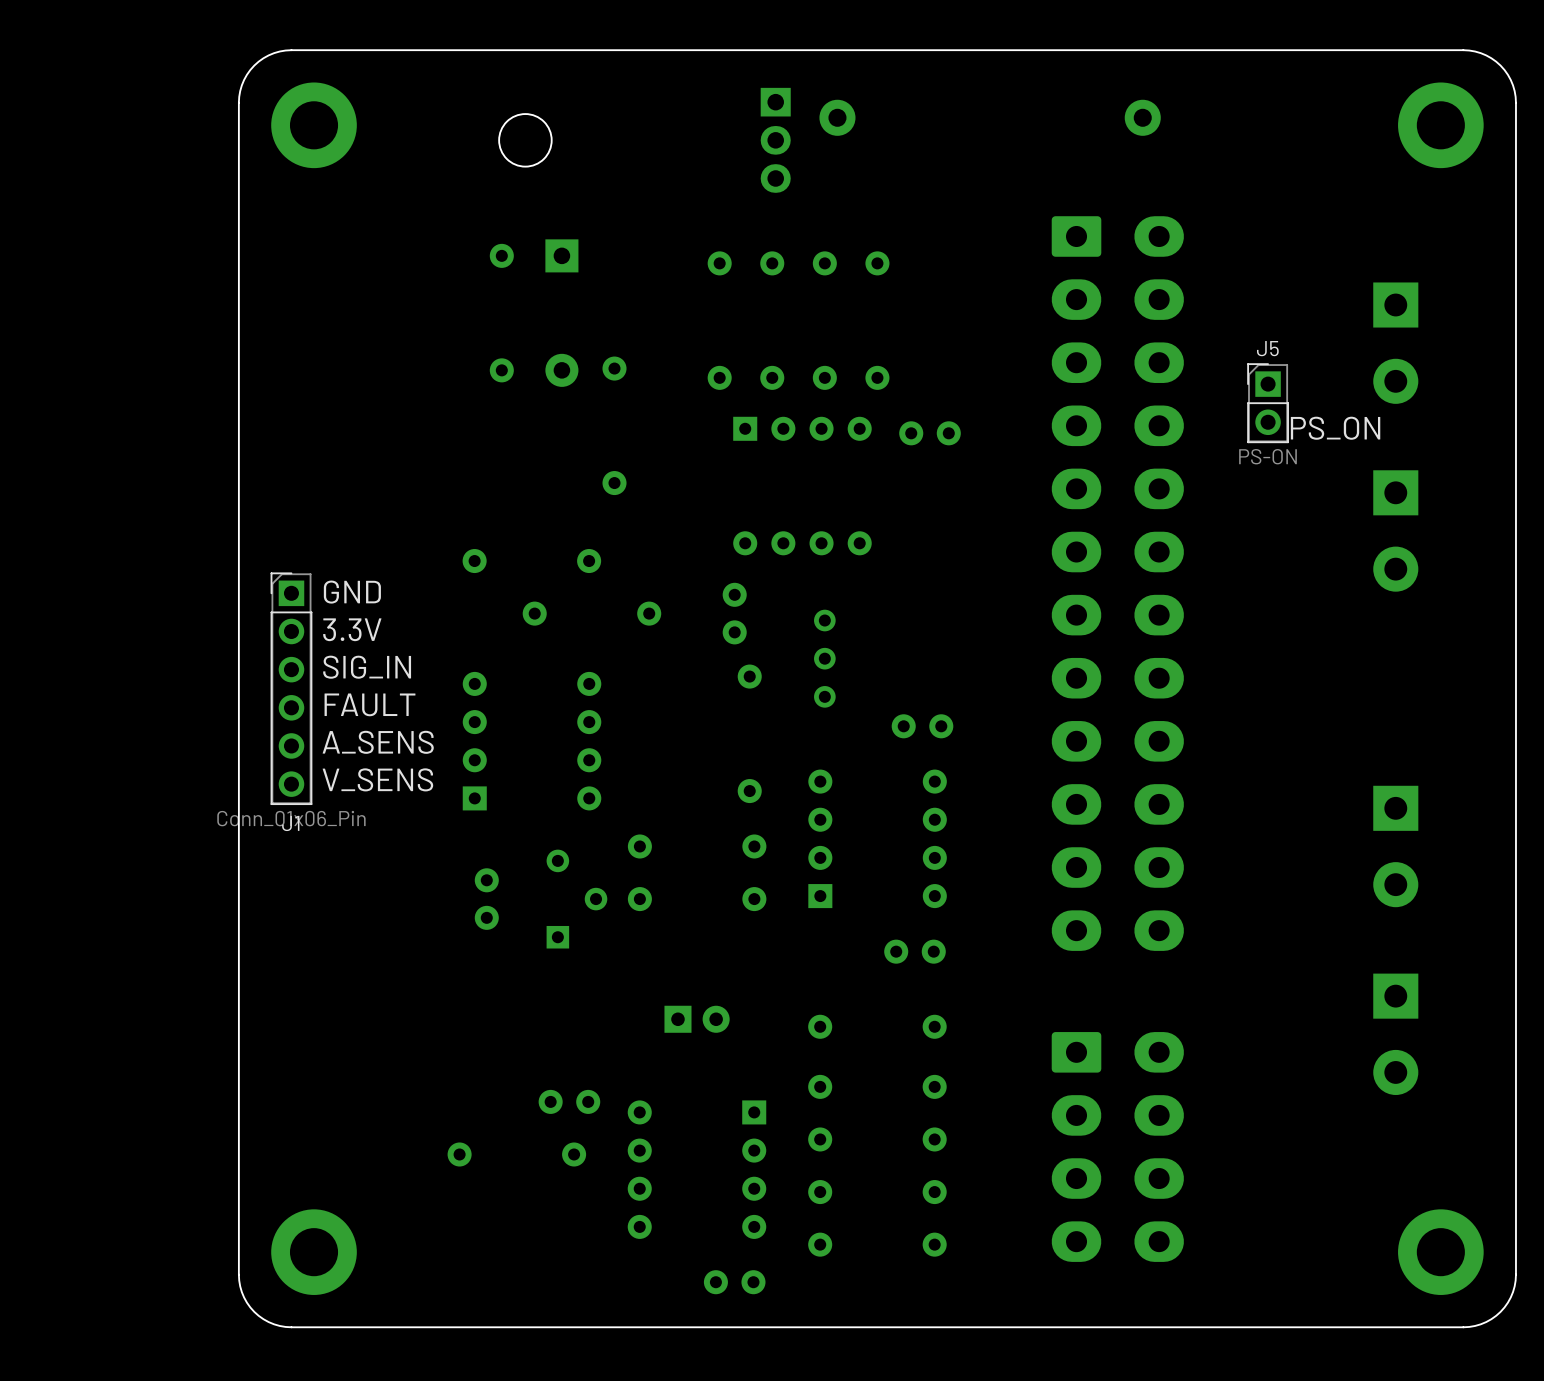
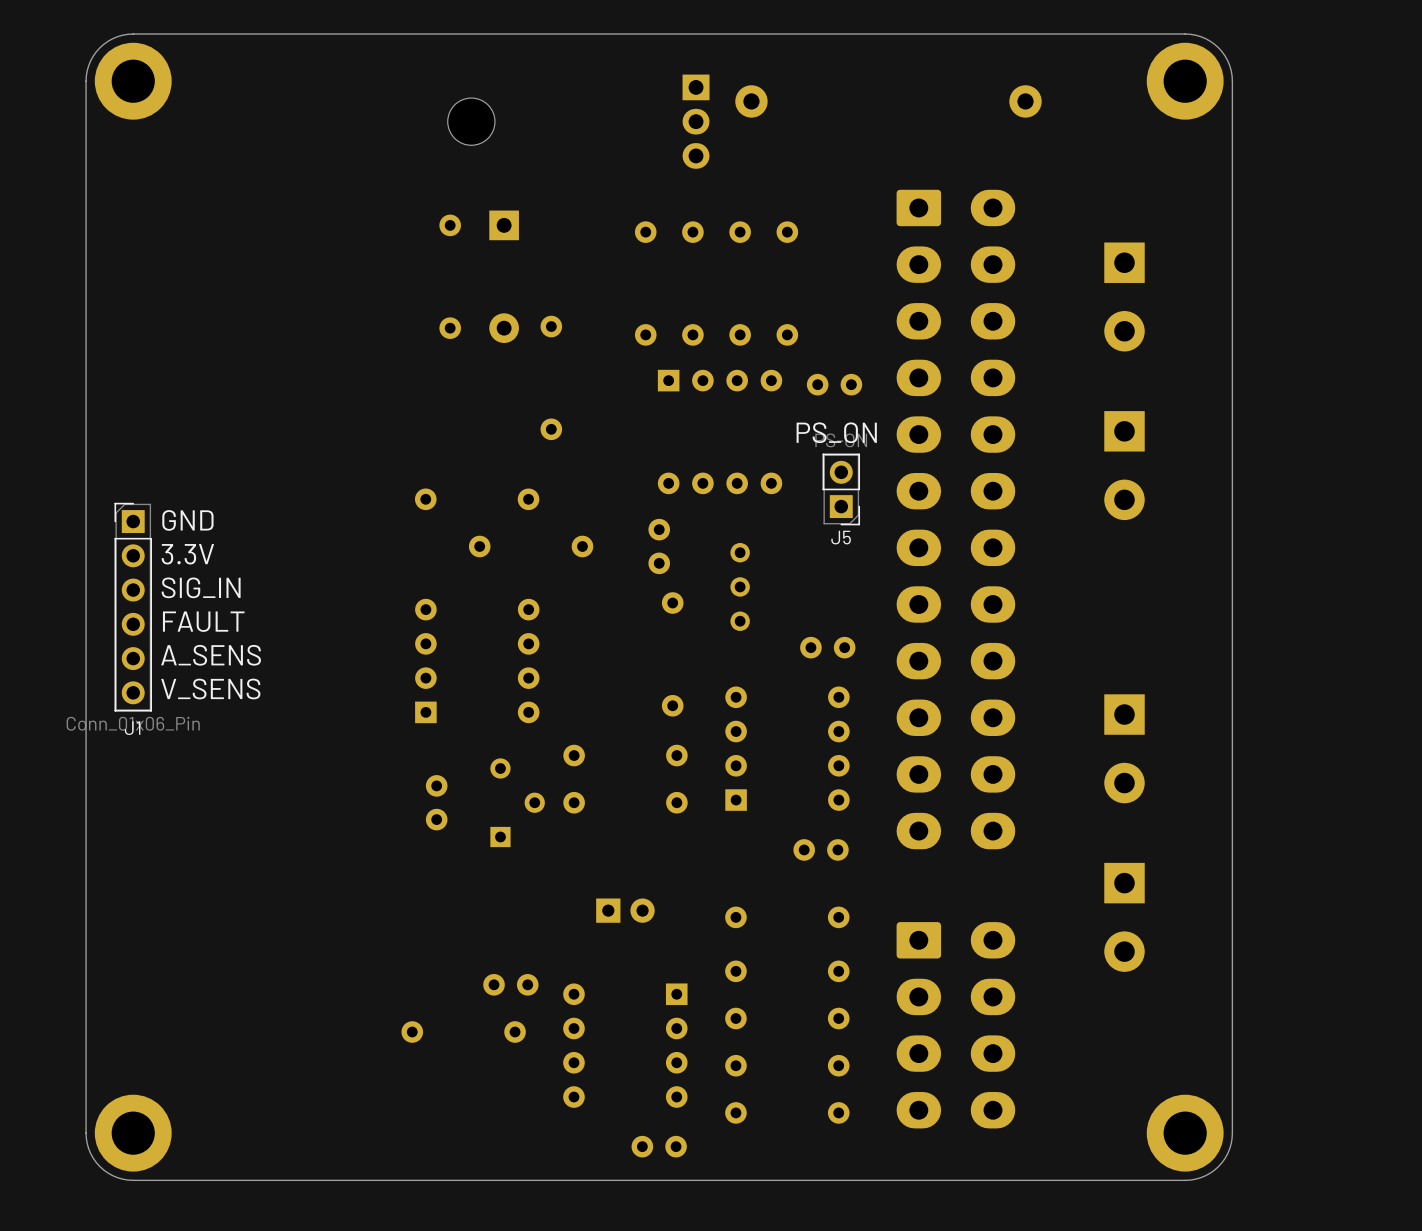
board edge: (1463, 50) (291, 50) (274, 53) (254, 65) (241, 85) (238, 102) (238, 1274) (241, 1292) (254, 1311) (274, 1324) (291, 1327) (1463, 1327) (1480, 1324) (1500, 1311) (1513, 1292) (1515, 1274) (1515, 102) (1513, 85) (1500, 65) (1480, 53) (1463, 50) -> (1185, 34) (133, 34) (112, 38) (99, 47) (88, 65) (86, 81) (86, 1133) (90, 1153) (99, 1166) (112, 1175) (133, 1180) (1185, 1180) (1205, 1175) (1218, 1166) (1229, 1148) (1232, 1133) (1232, 81) (1227, 60) (1218, 47) (1200, 36) (1185, 34)
part position: (314, 125) -> (133, 81)
part position: (1440, 125) -> (1185, 81)
part: none -> (1124, 297)
part: (1395, 343) -> none
J5 rotation: 0° (1268, 403) -> 180° (841, 489)
J5 position: (1268, 403) -> (841, 489)
text: PS_ON (1335, 428) -> none
text: none -> PS_ON (836, 432)
part: none -> (1124, 465)
part: (1395, 530) -> none
part position: (1117, 583) -> (955, 519)
text position: GND (352, 592) -> GND (187, 520)
text position: 3.3V (352, 629) -> 3.3V (187, 554)
text position: SIG_IN (367, 667) -> SIG_IN (201, 587)
J1 position: (291, 688) -> (133, 607)
text position: FAULT (369, 704) -> FAULT (203, 621)
text position: A_SENS (378, 742) -> A_SENS (211, 655)
text position: V_SENS (377, 779) -> V_SENS (210, 689)
part: none -> (1124, 748)
part: (1395, 846) -> none
part: none -> (1124, 917)
part: (1395, 1034) -> none
part position: (1117, 1146) -> (955, 1025)
part position: (314, 1252) -> (133, 1133)
part position: (1440, 1252) -> (1185, 1133)

